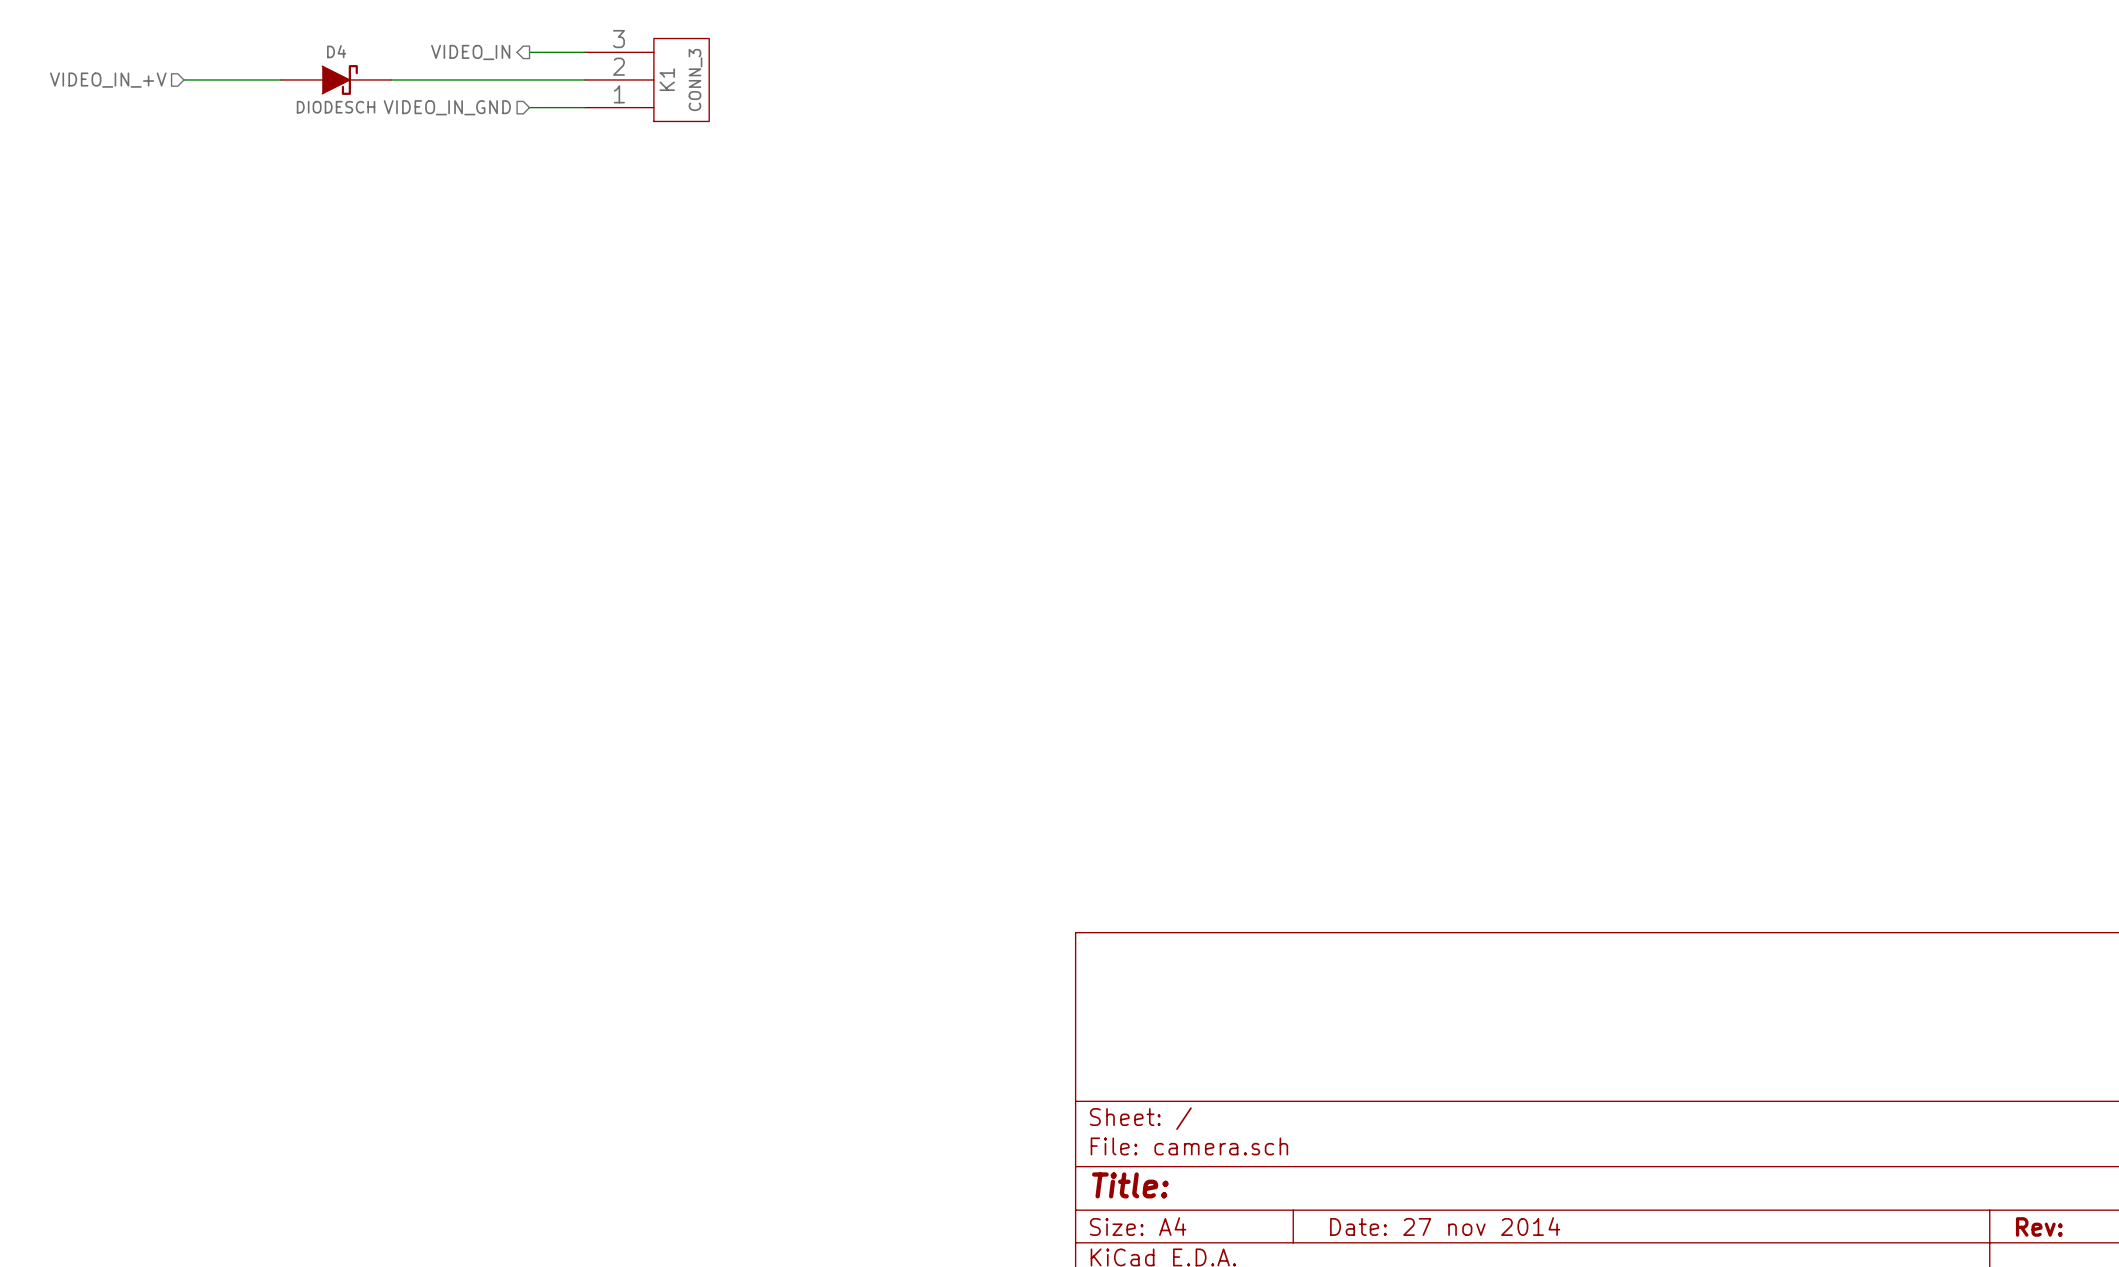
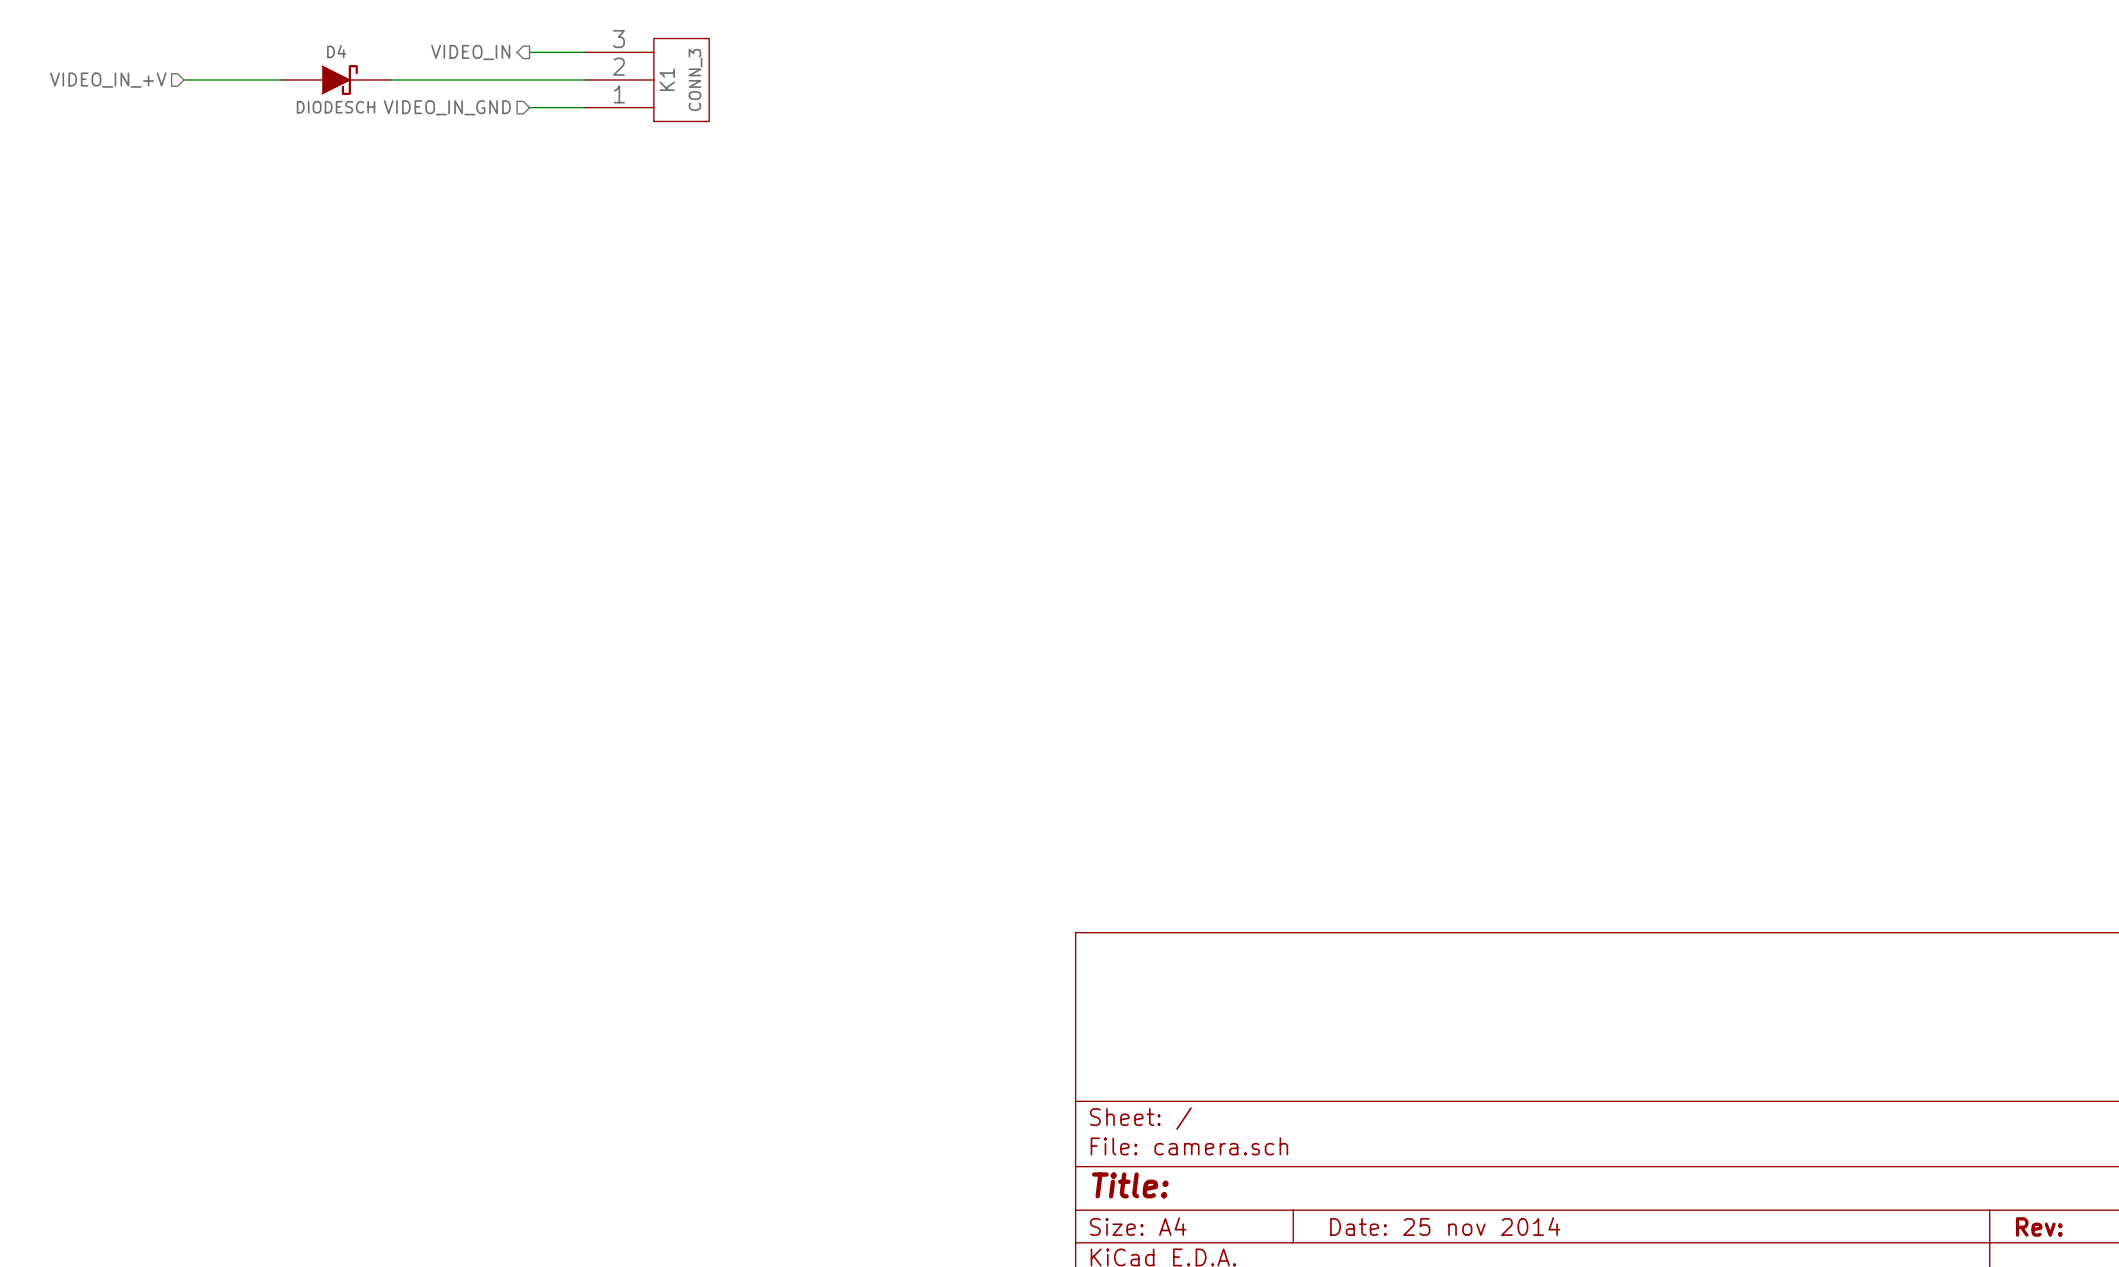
title block: Date: 27 nov 2014 (1445, 1226) -> Date: 25 nov 2014 (1445, 1226)

